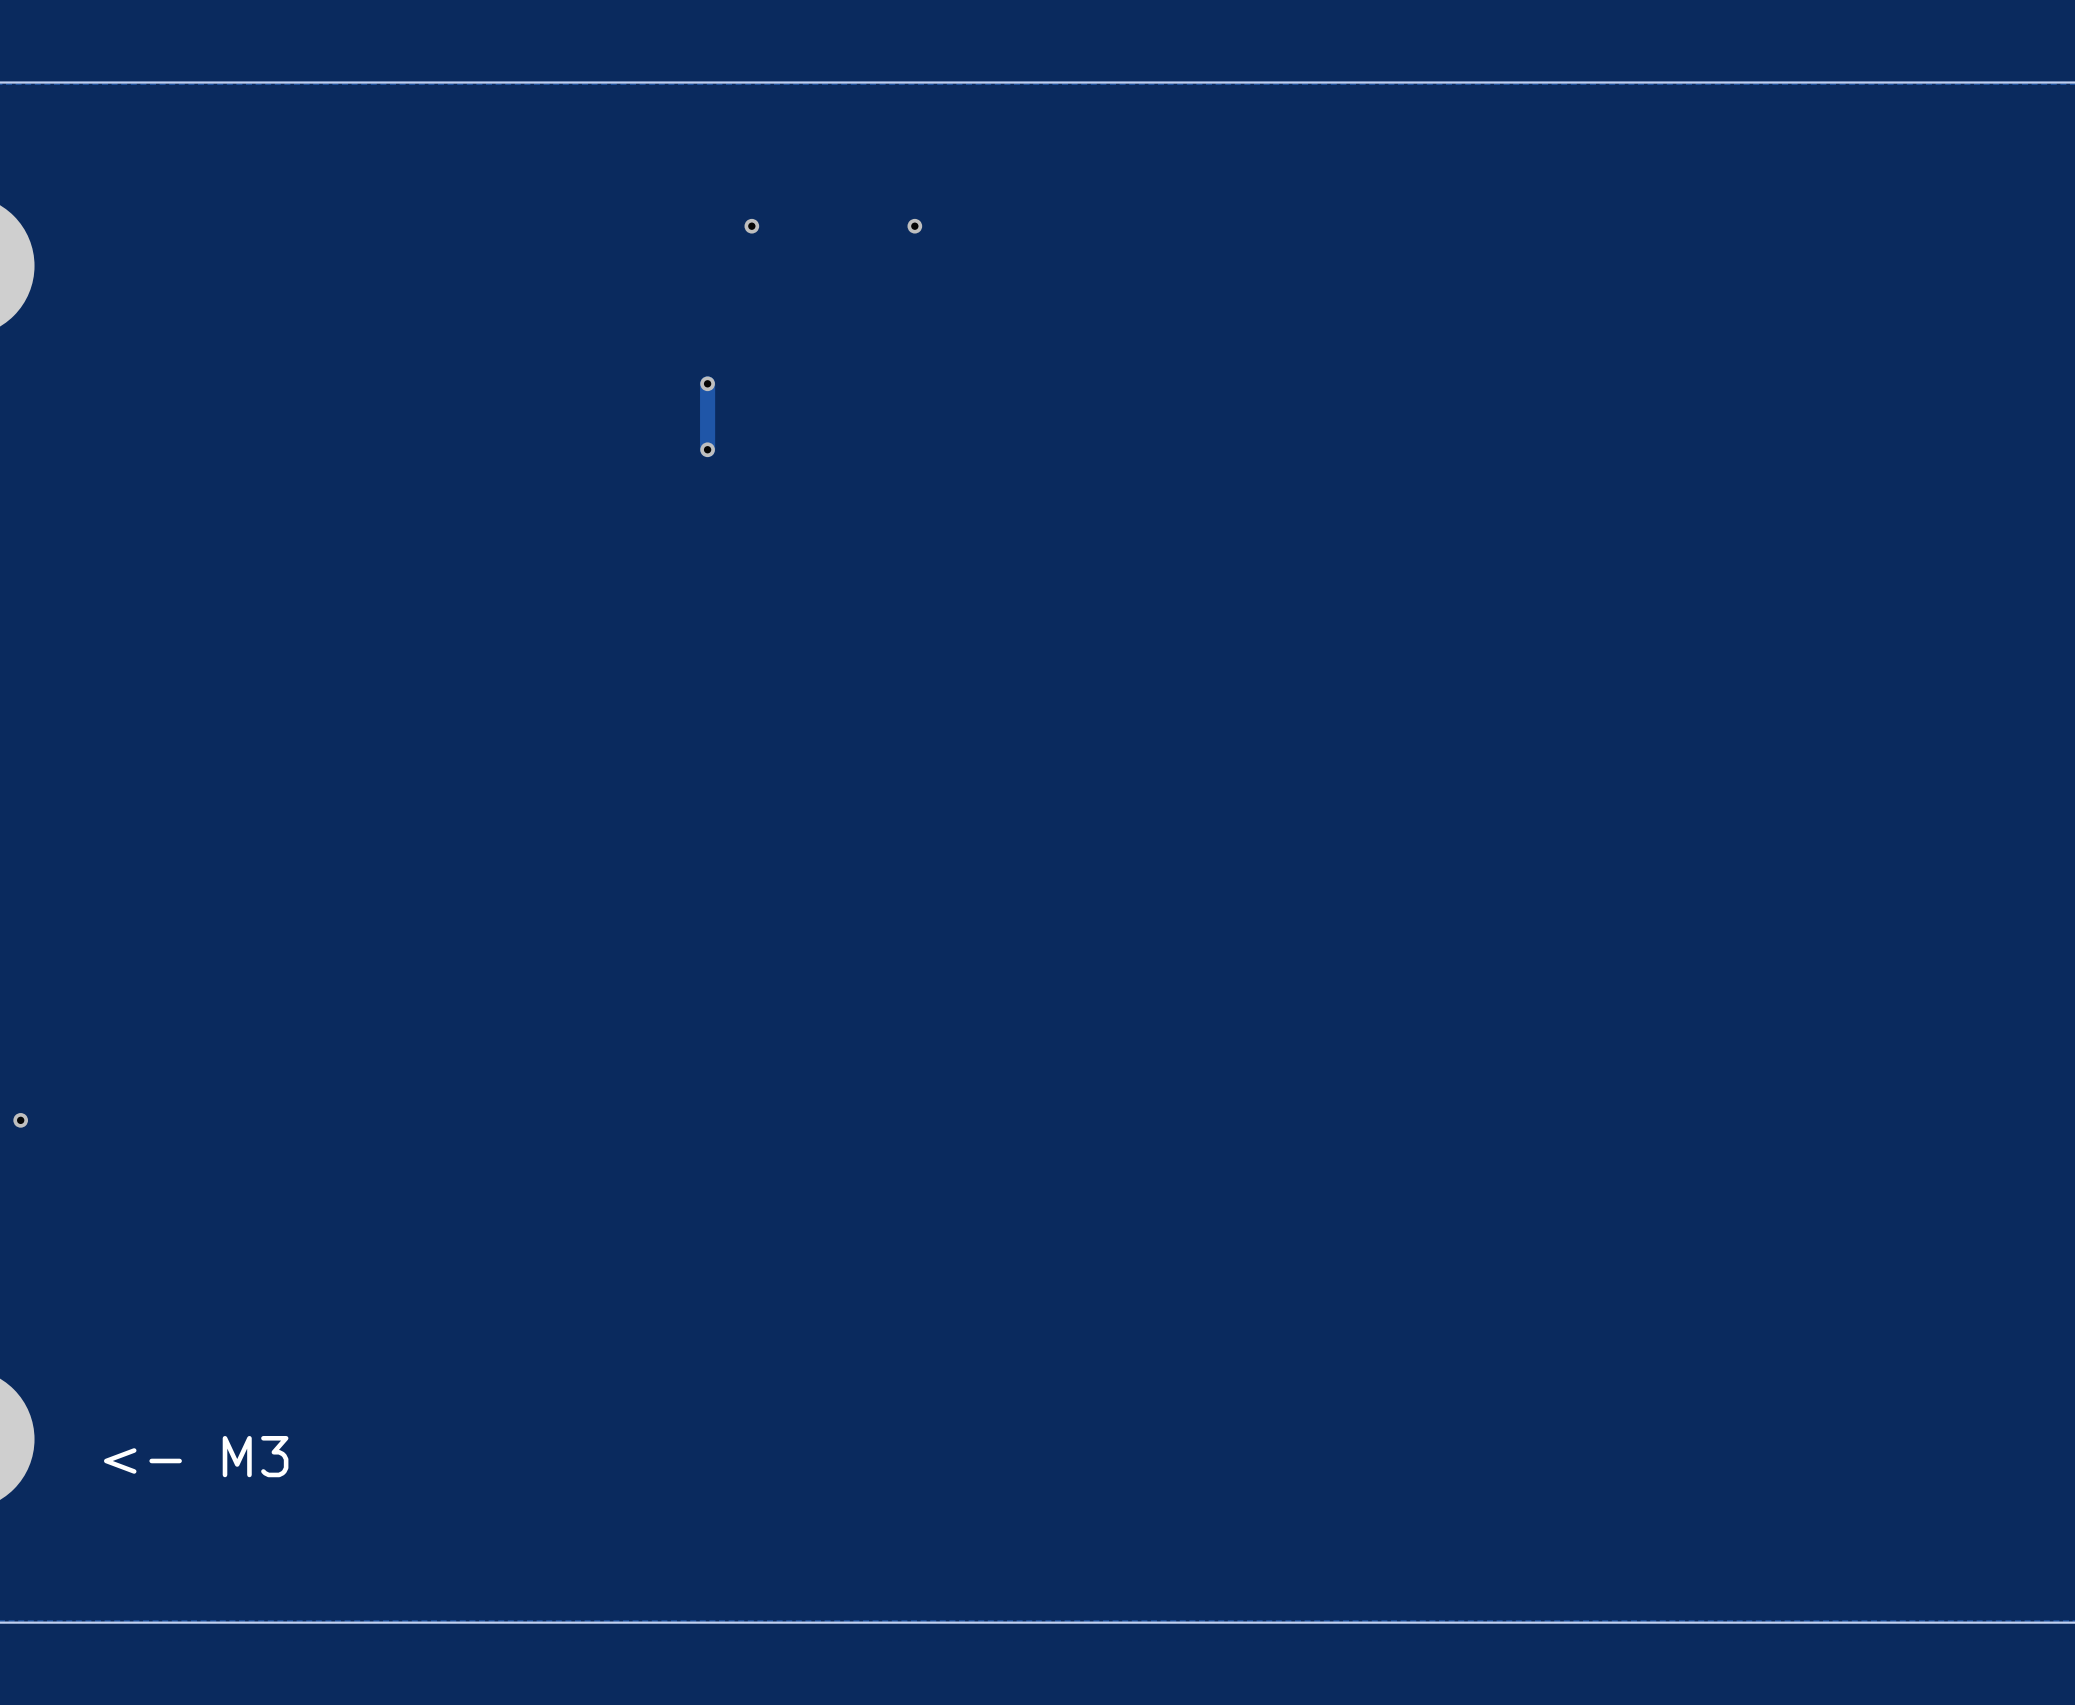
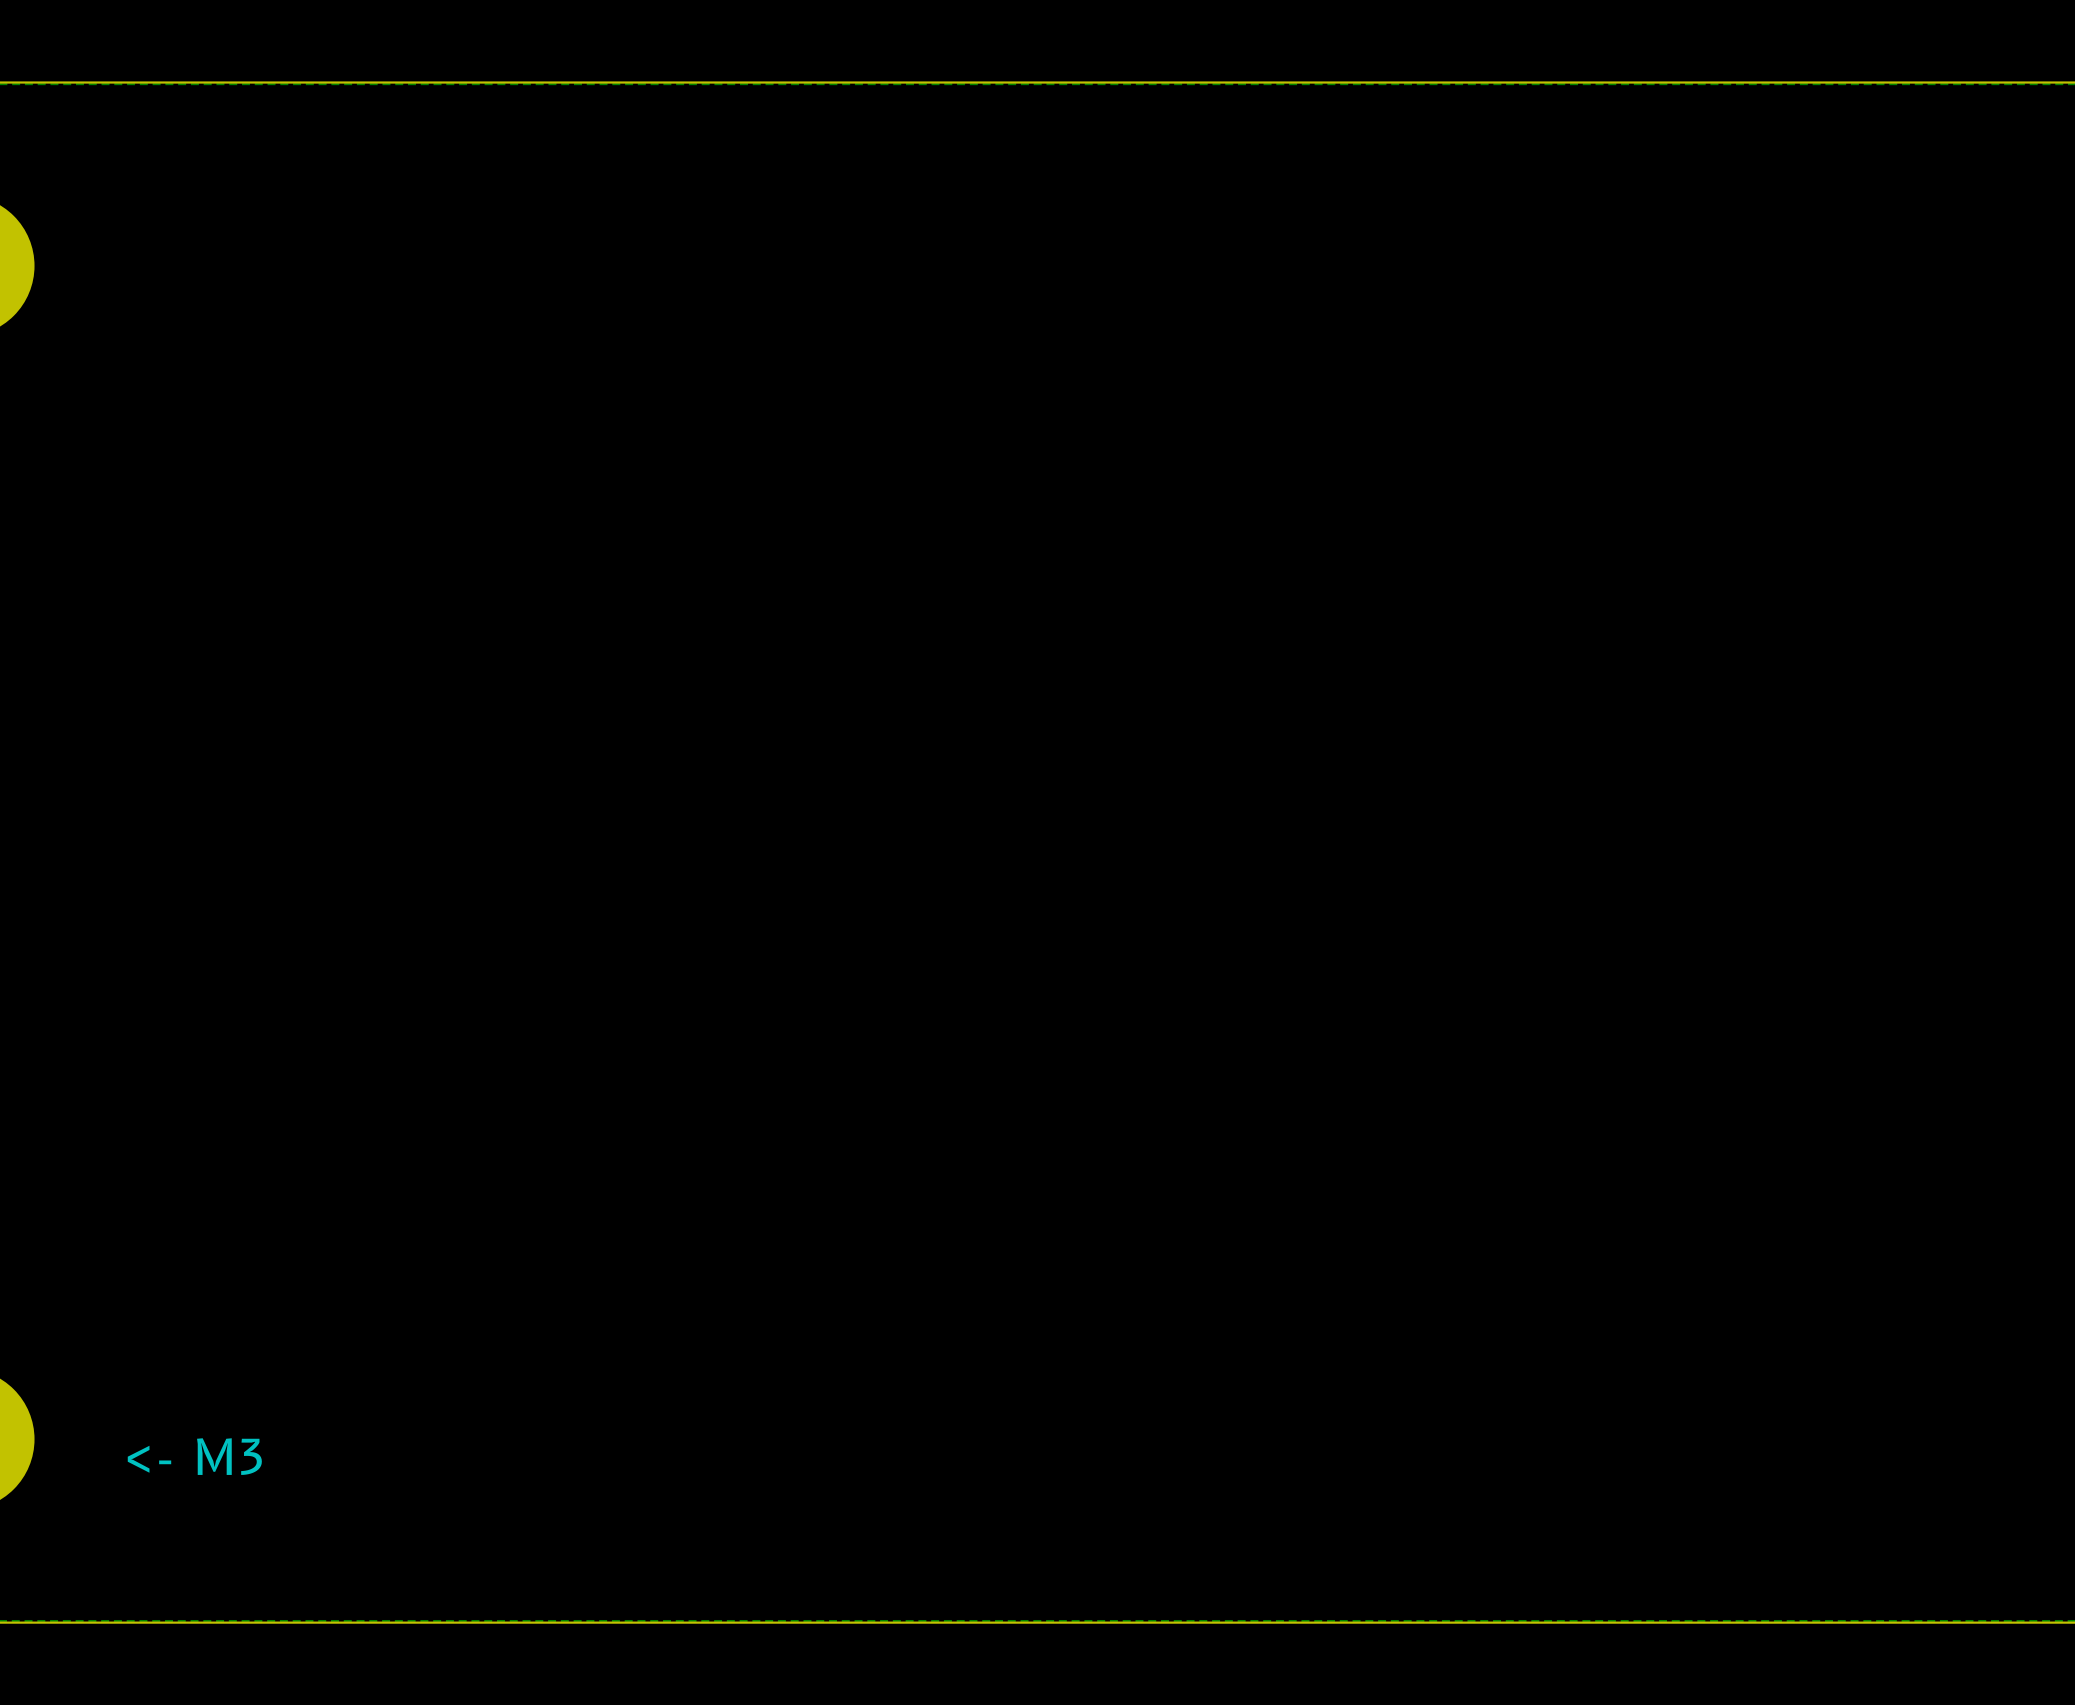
via: (751, 226) -> none
via: (914, 226) -> none
track: (707, 383) (707, 449) -> none
via: (707, 383) -> none
via: (707, 449) -> none
via: (20, 1120) -> none

